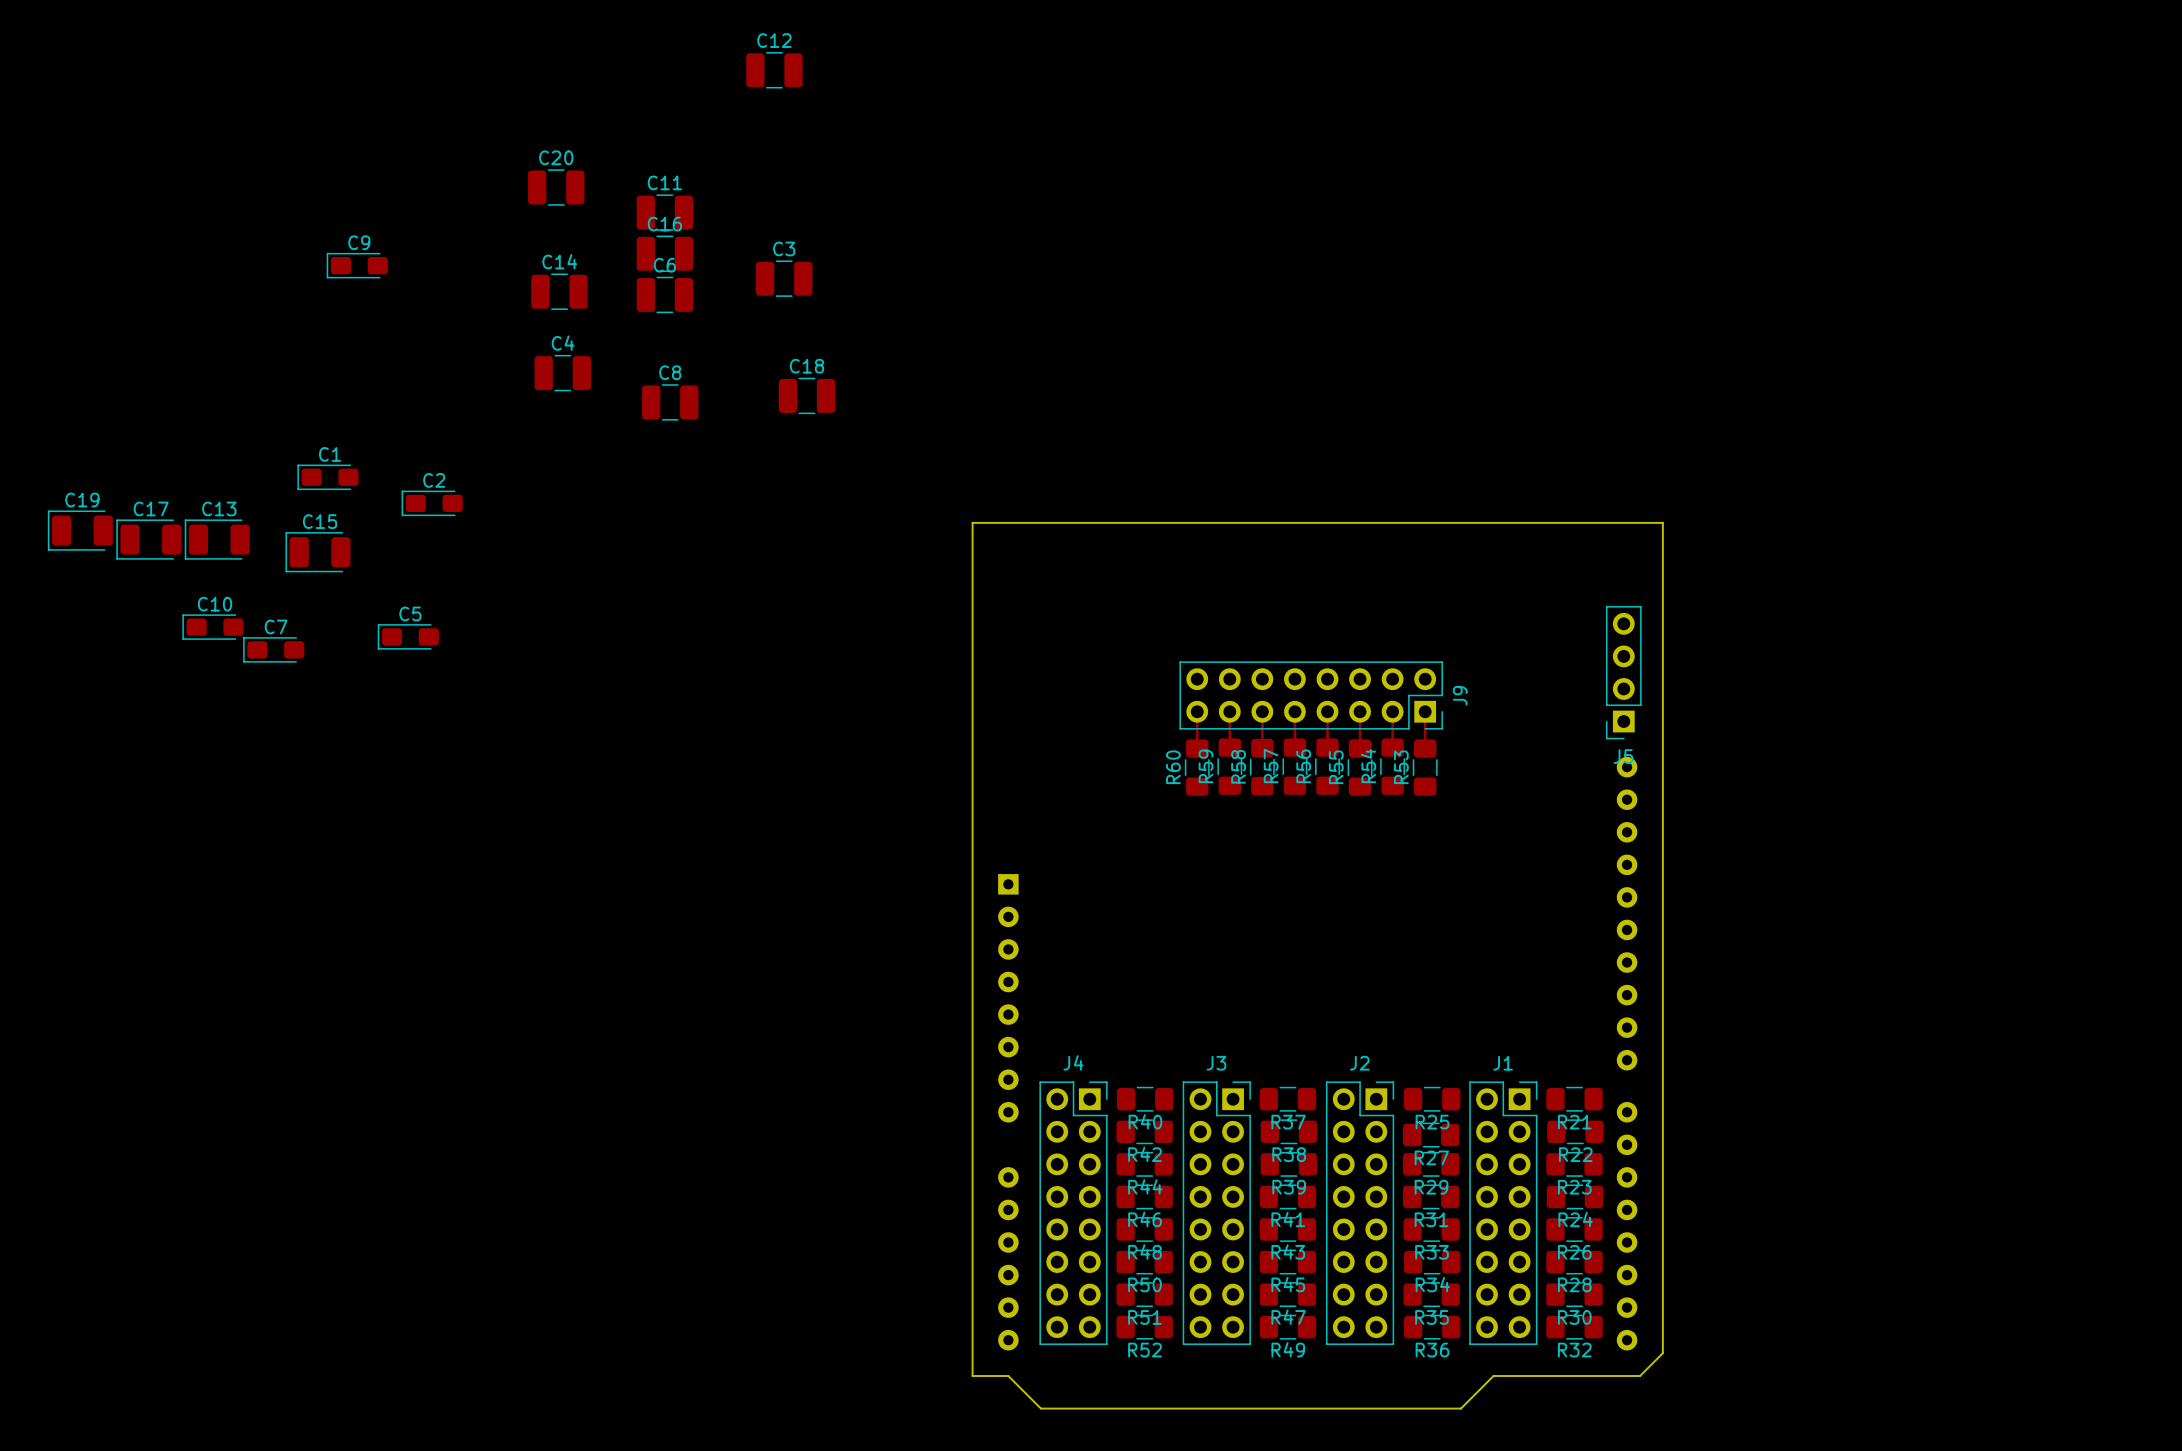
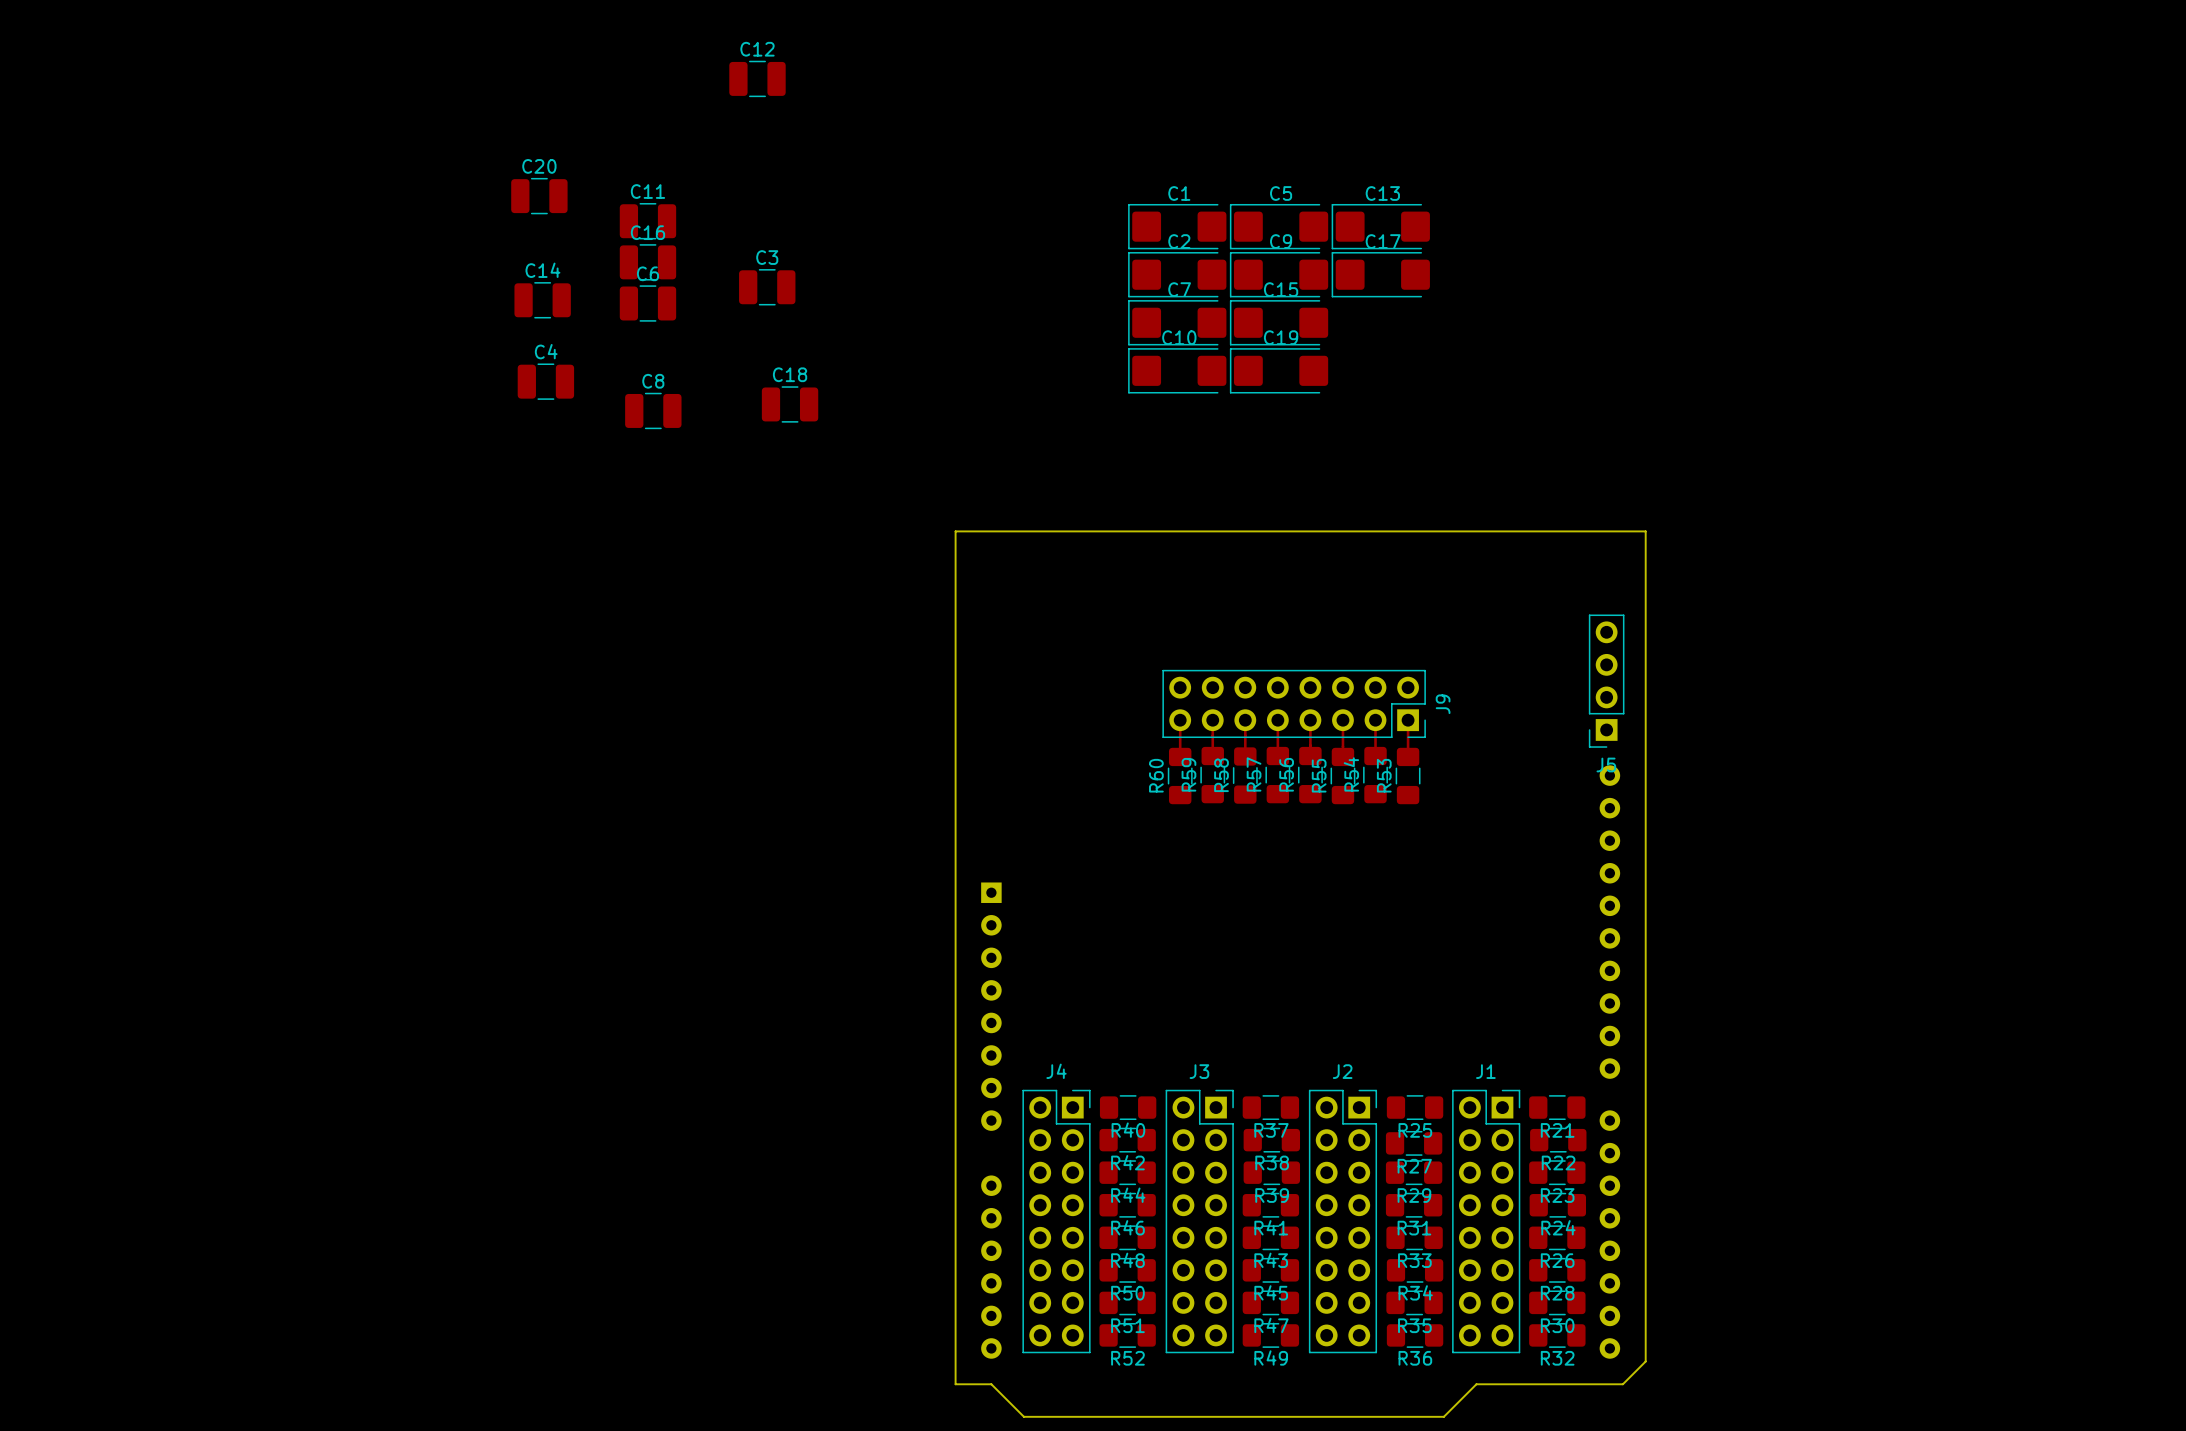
C9 footprint: [326, 252, 388, 279] -> [1229, 252, 1329, 298]
C1 footprint: [297, 464, 359, 491] -> [1128, 203, 1227, 250]
C2 footprint: [401, 490, 463, 517] -> [1128, 252, 1227, 298]
C19 footprint: [47, 510, 113, 551] -> [1229, 348, 1329, 394]
C17 footprint: [116, 519, 182, 560] -> [1331, 252, 1430, 298]
C13 footprint: [184, 519, 250, 560] -> [1331, 203, 1430, 250]
C15 footprint: [285, 532, 351, 573] -> [1229, 300, 1329, 346]
C10 footprint: [182, 614, 244, 640] -> [1128, 348, 1227, 394]
C5 footprint: [377, 624, 439, 650] -> [1229, 203, 1329, 250]
C7 footprint: [243, 637, 305, 663] -> [1128, 300, 1227, 346]

